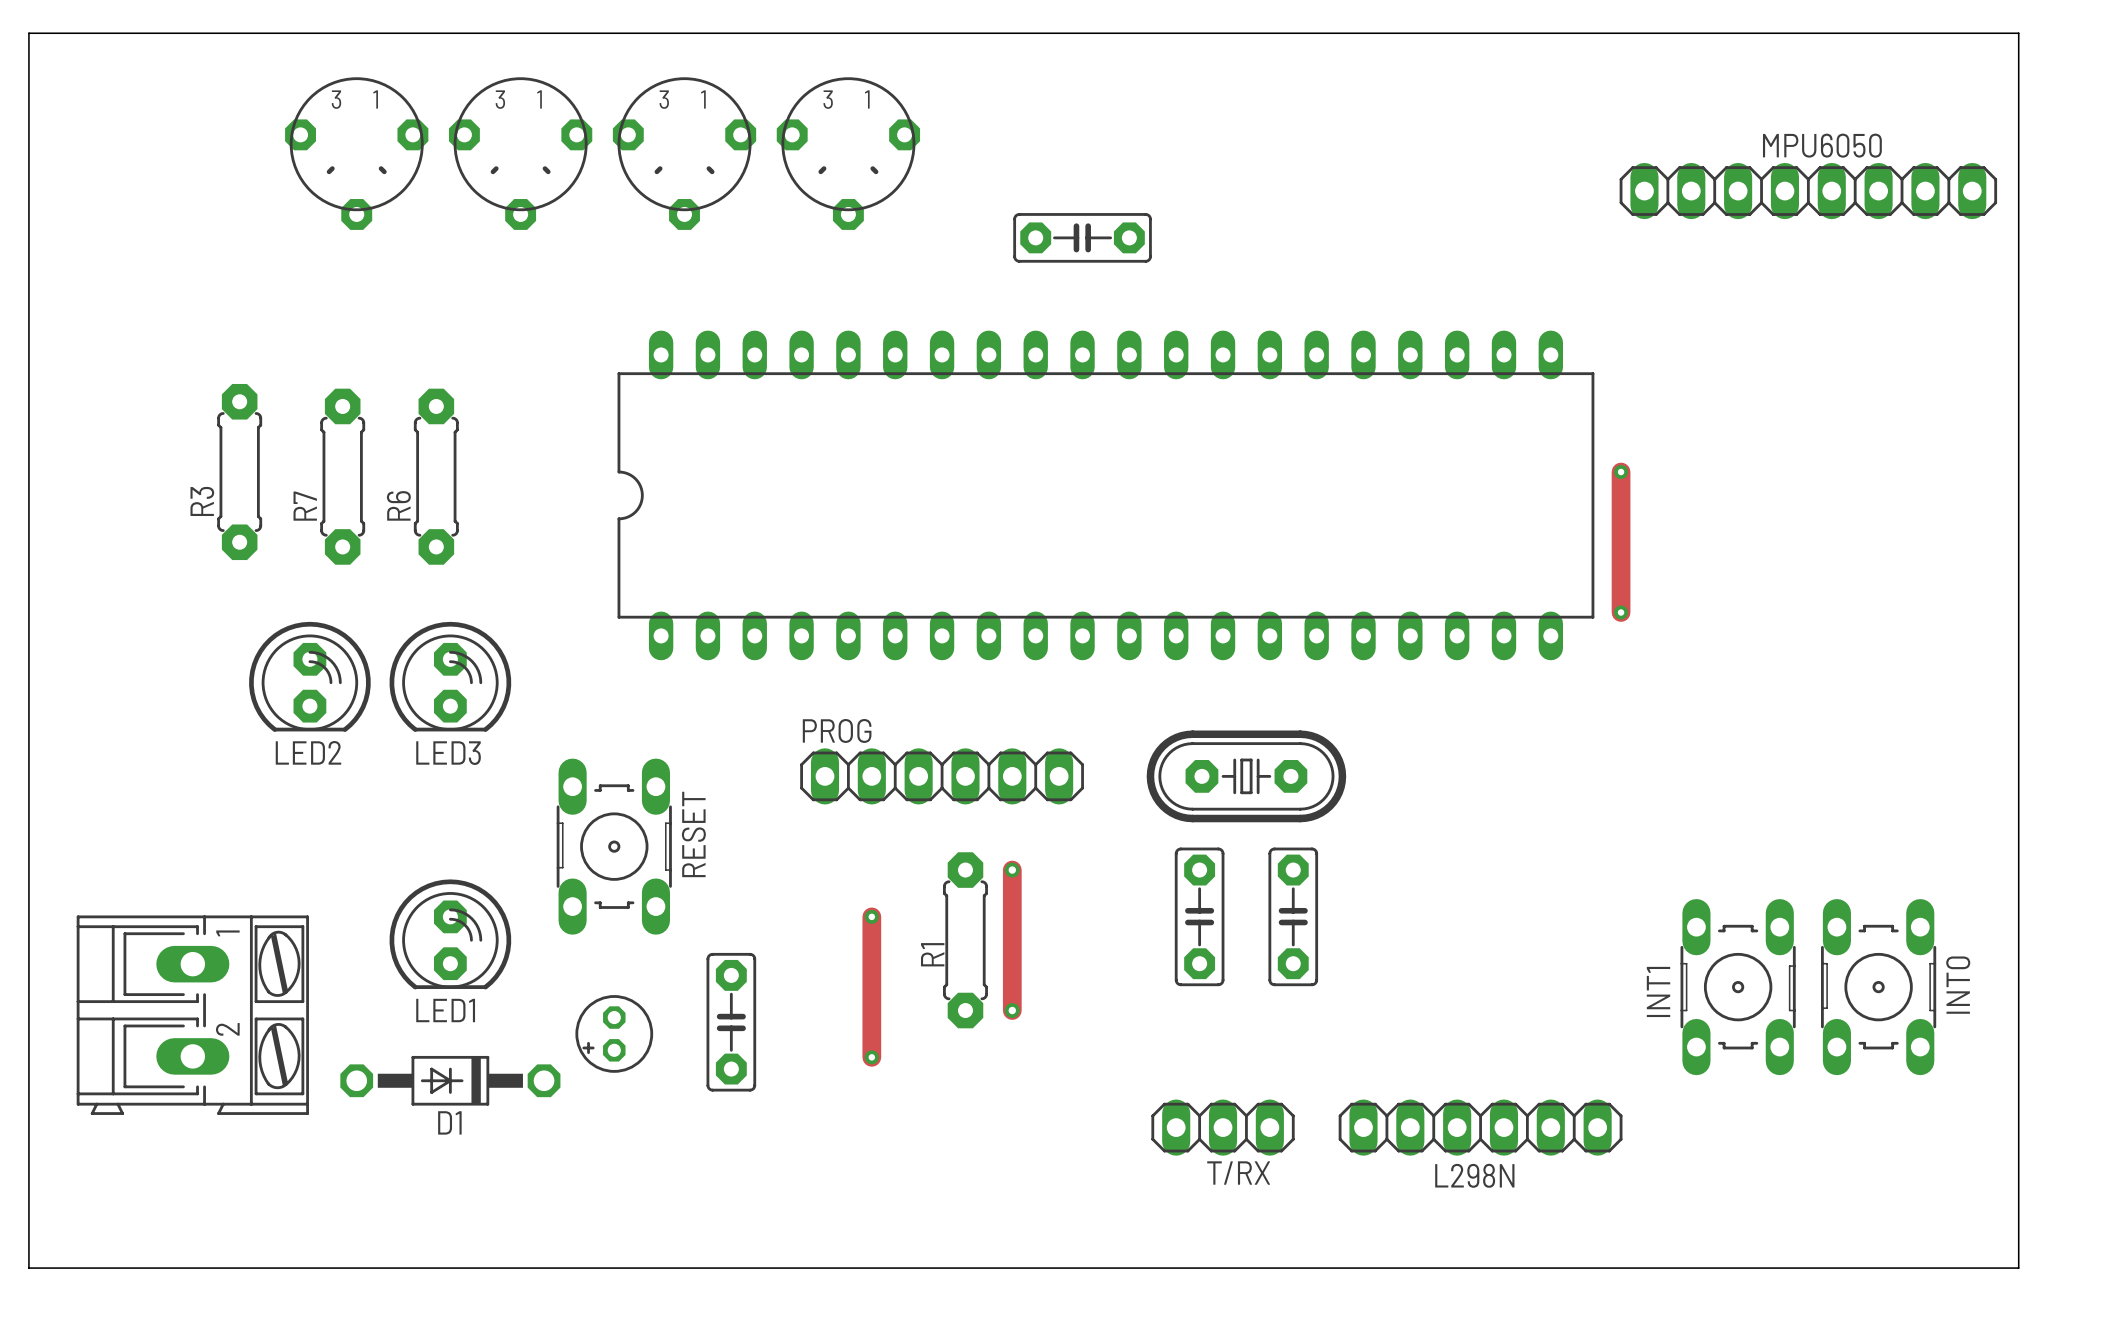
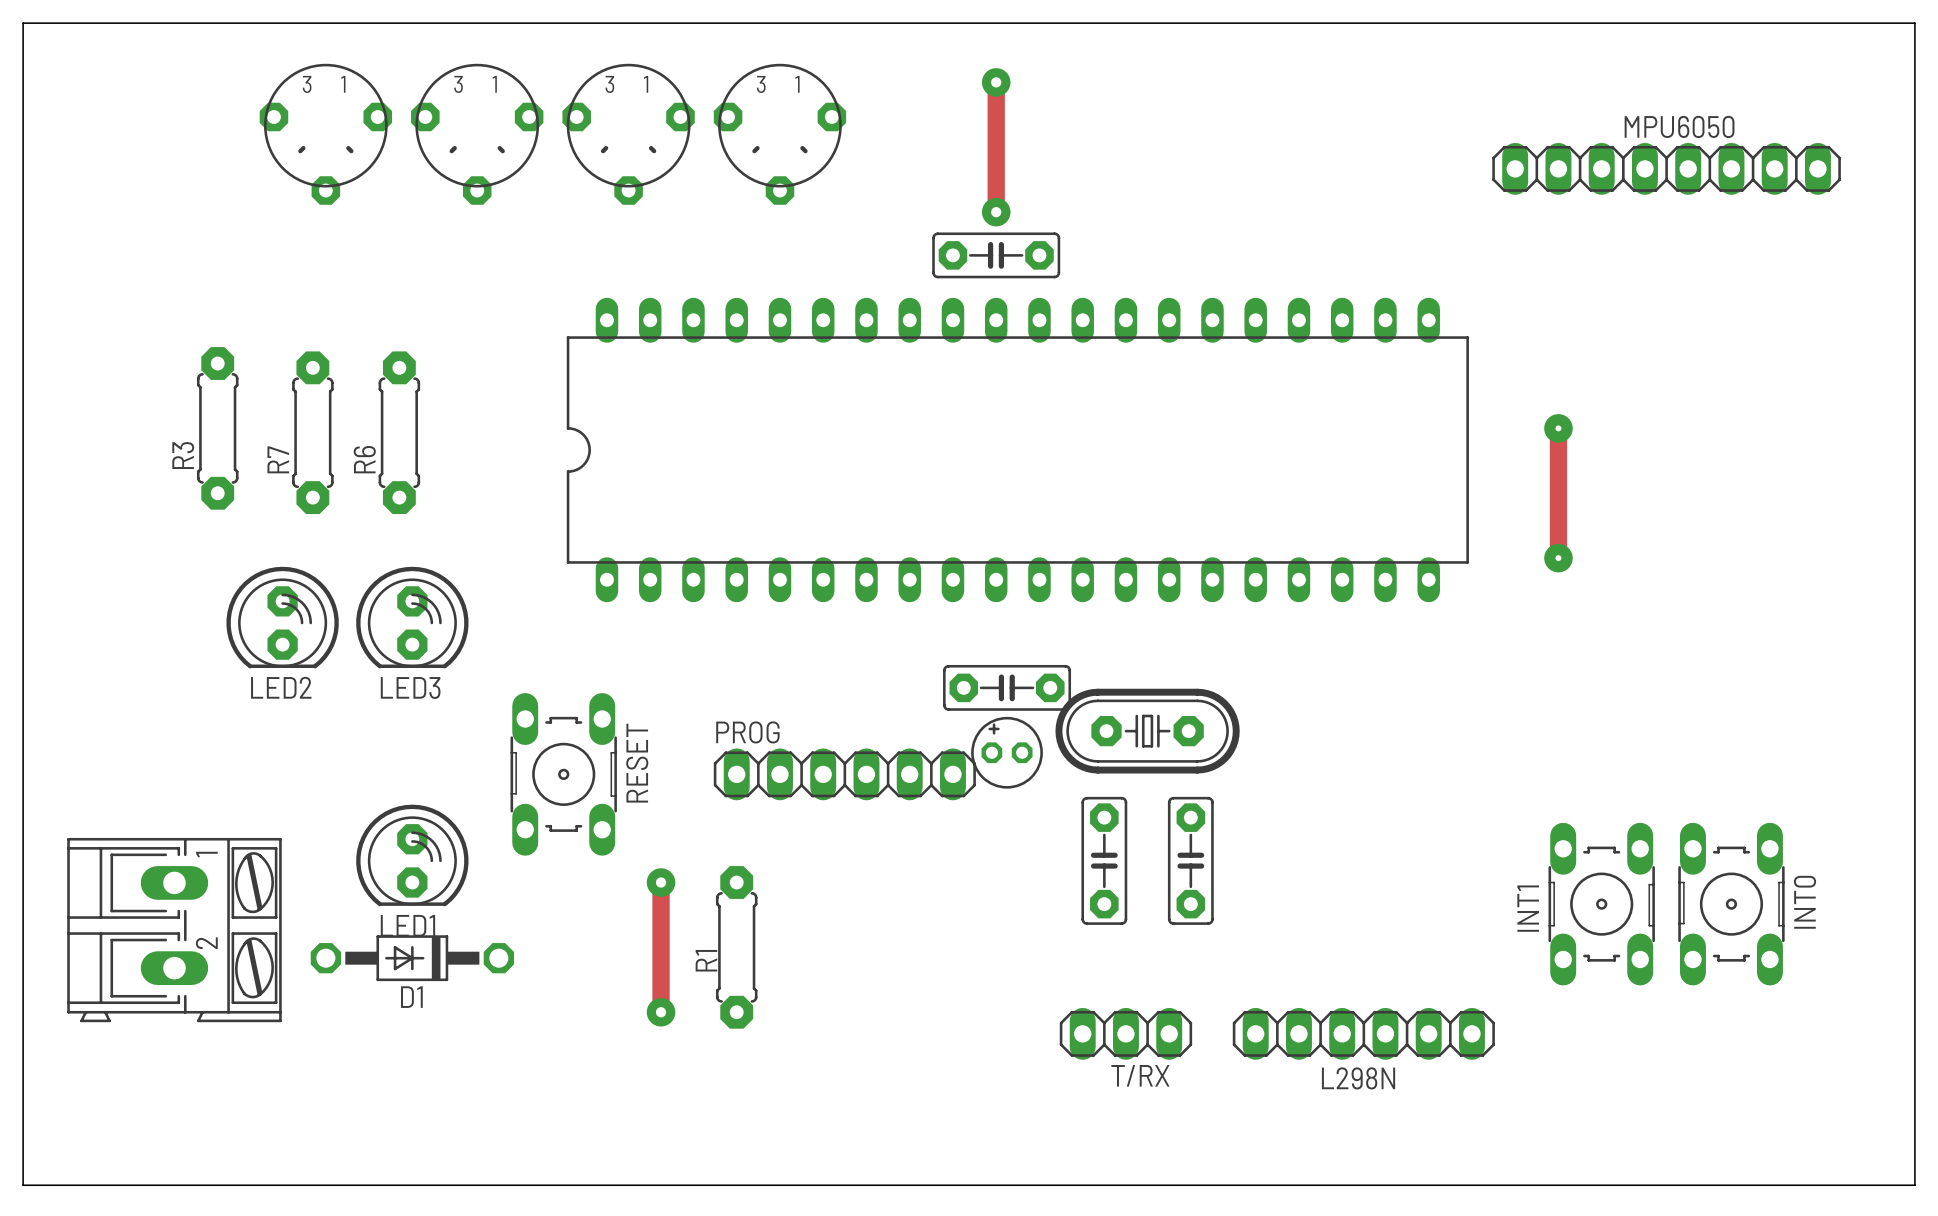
board edge: (2018, 33) (2018, 1268) (28, 1268) -> (1860, 23) (1914, 23) (1914, 1185) (23, 1185) (23, 1163)
track: none -> (996, 82) (996, 212)
via: none -> (996, 82)
part position: (1082, 237) -> (996, 255)
via: none -> (996, 212)
track: (1621, 472) (1621, 612) -> (1558, 428) (1558, 558)
via: (1621, 472) -> none
via: none -> (1558, 428)
via: (1621, 612) -> none
via: none -> (1558, 558)
part: none -> (1007, 687)
PROG position: (942, 776) -> (844, 774)
part position: (1246, 776) -> (1147, 731)
part: none -> (1007, 752)
track: (1012, 870) (1012, 1010) -> none
via: (1012, 870) -> none
track: (871, 916) (871, 1057) -> (661, 882) (661, 1012)
via: (871, 916) -> none
part position: (1199, 916) -> (1104, 860)
part position: (1293, 916) -> (1190, 860)
R1 position: (965, 940) -> (736, 947)
via: none -> (661, 882)
via: (1012, 1010) -> none
part: (731, 1022) -> none
part: (614, 1033) -> none
via: (871, 1057) -> none
D1 position: (450, 1080) -> (412, 958)
via: none -> (661, 1012)

